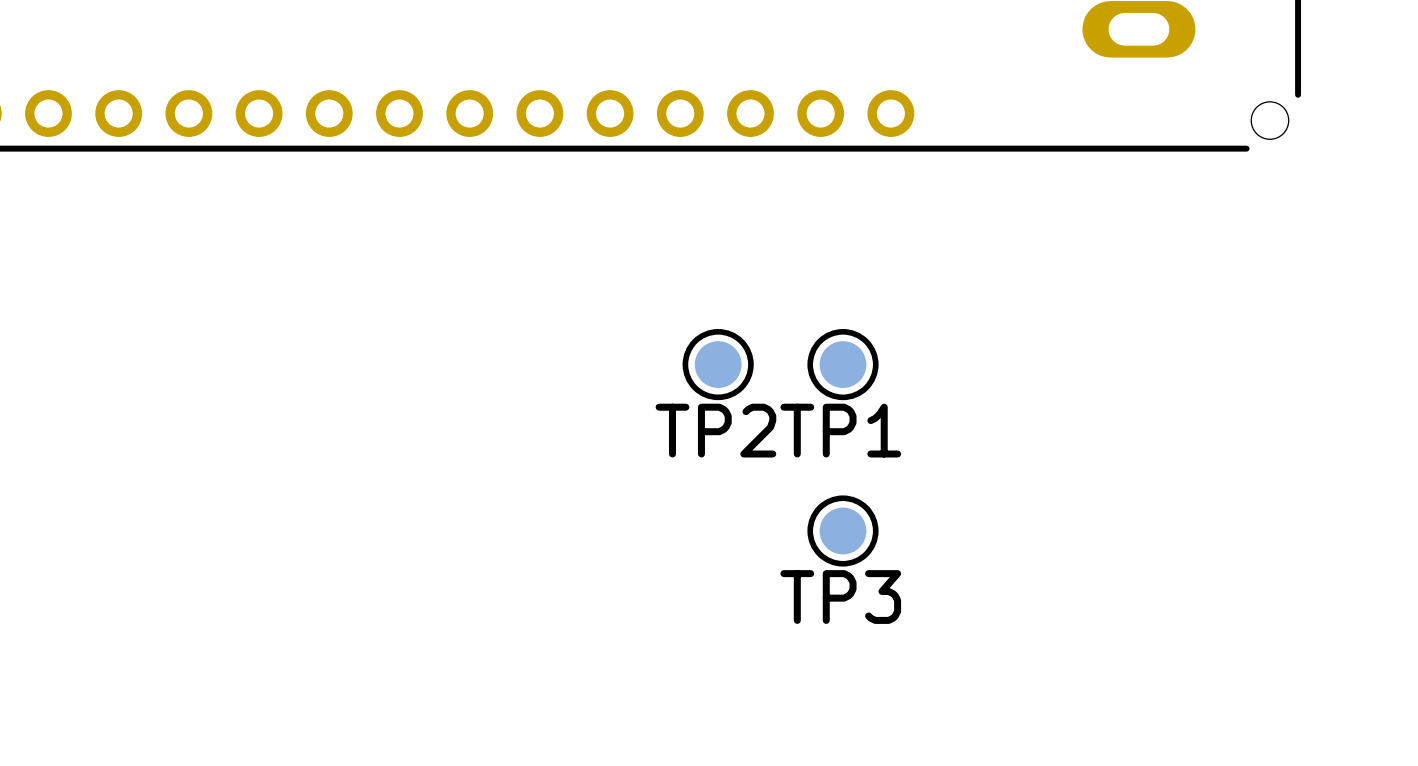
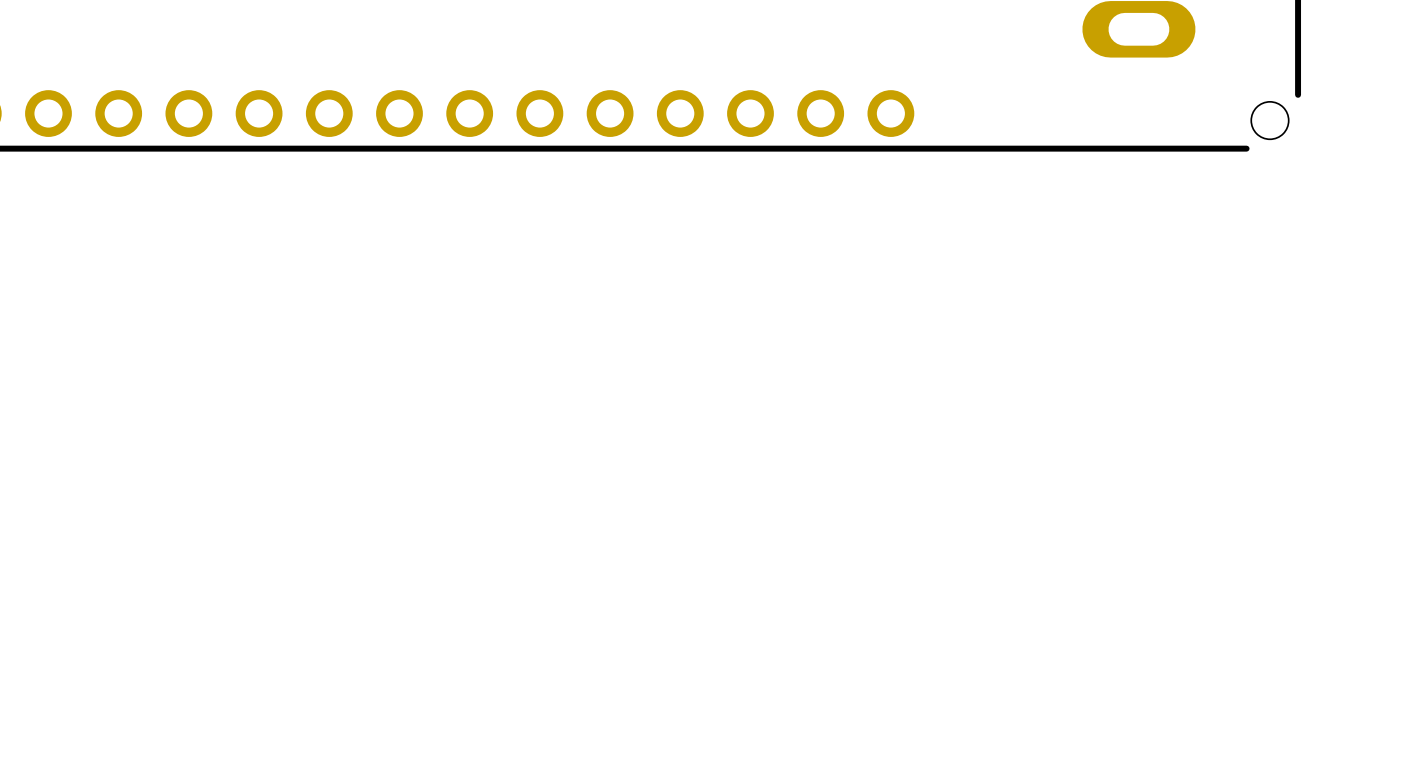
TP2: (718, 364) -> none
TP1: (842, 364) -> none
TP3: (842, 531) -> none

